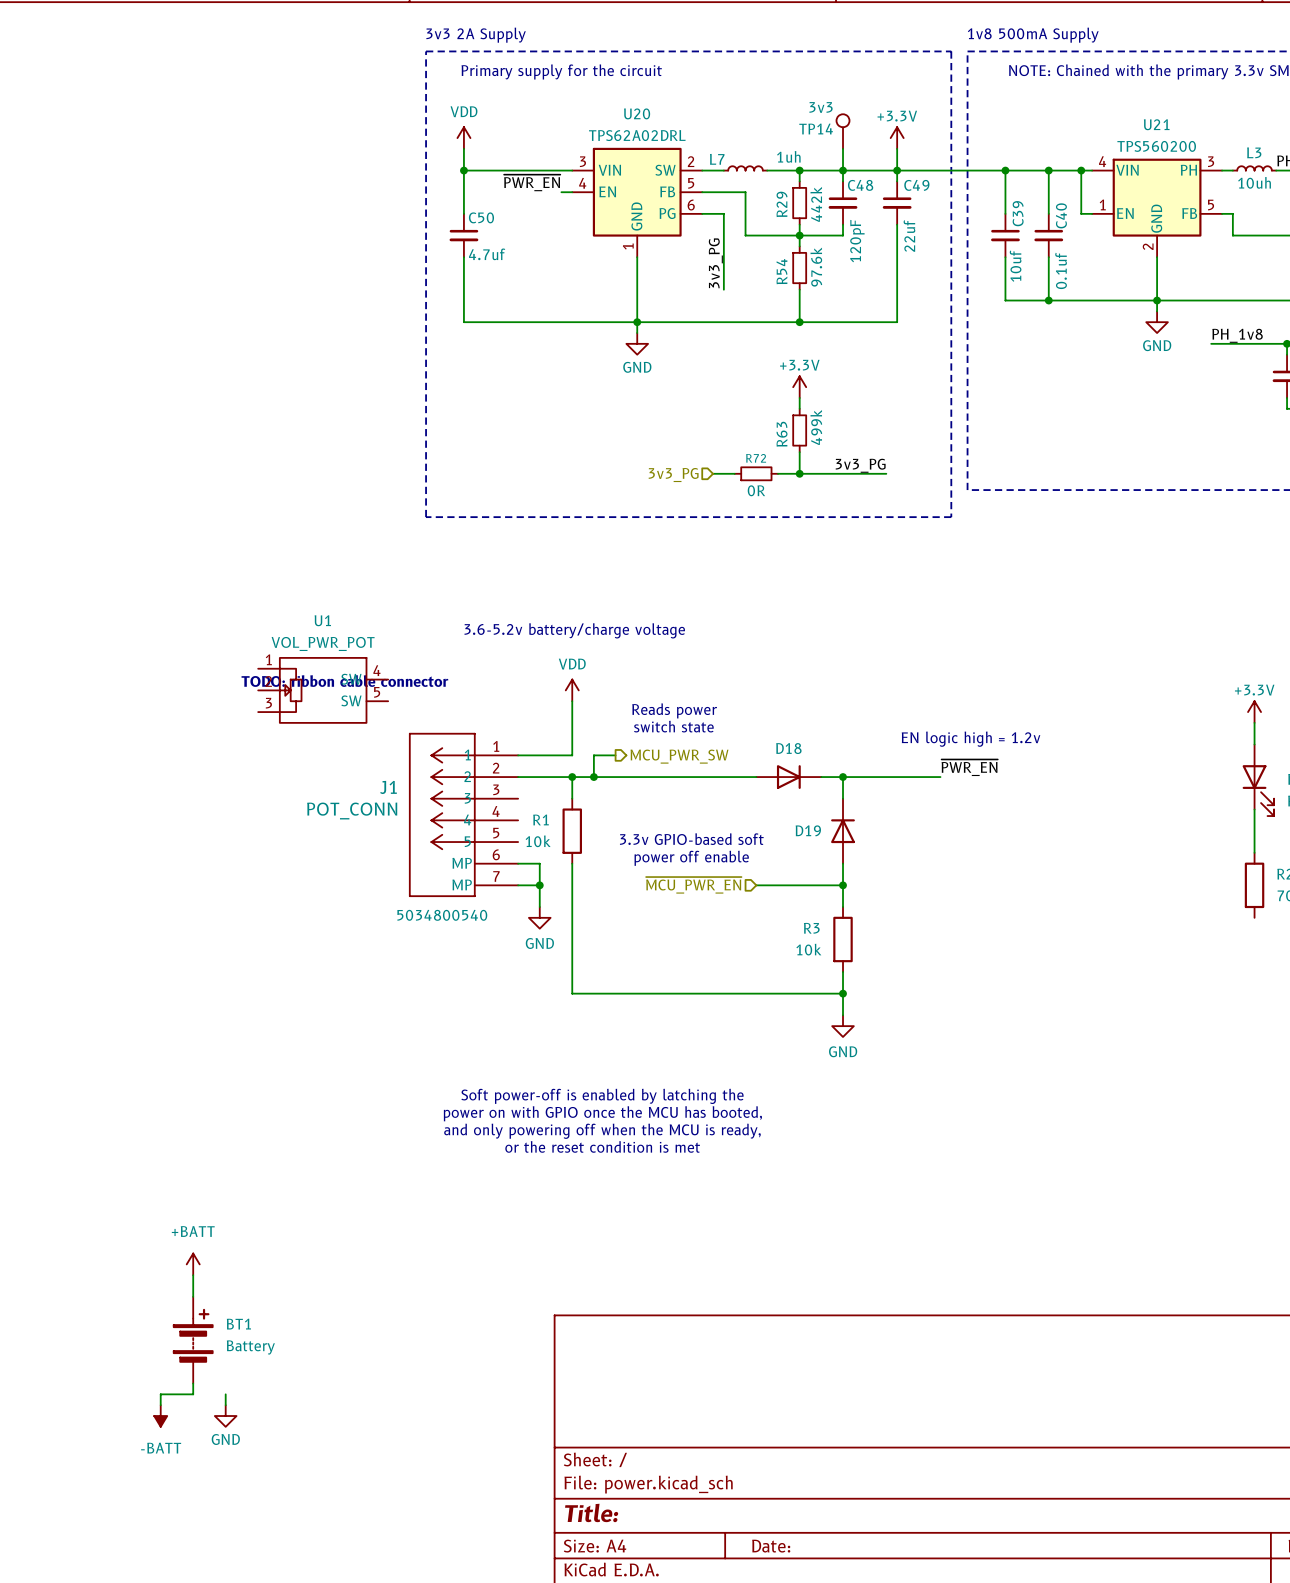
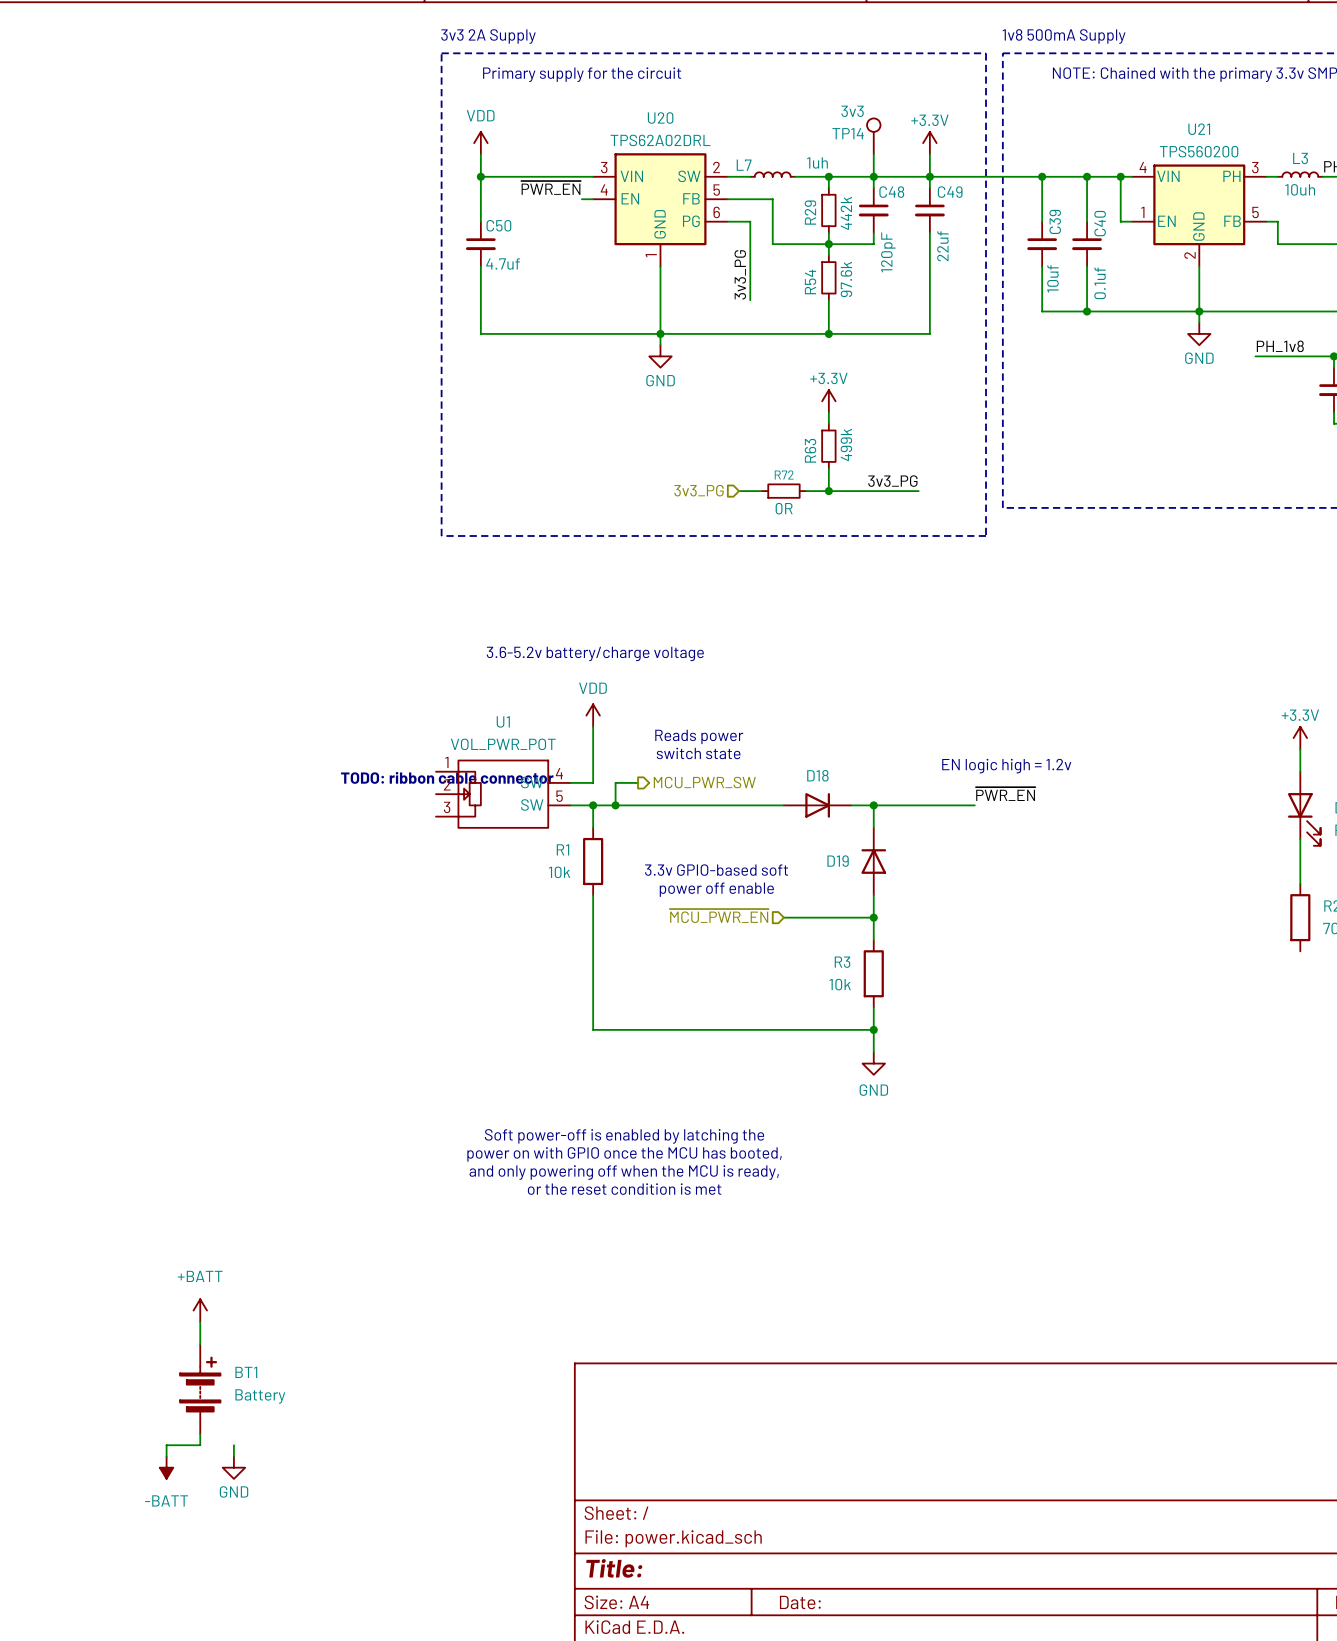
text position: TODO: ribbon cable connector (344, 681) -> TODO: ribbon cable connector (447, 777)
U1 position: (323, 690) -> (503, 794)
J1: POT_CONN (463, 814) -> none
wire: (518, 863) (539, 863) (539, 907) -> none
wire: (518, 885) (539, 885) -> none
junction: (539, 885) -> none
power symbol: GND (539, 917) -> none

